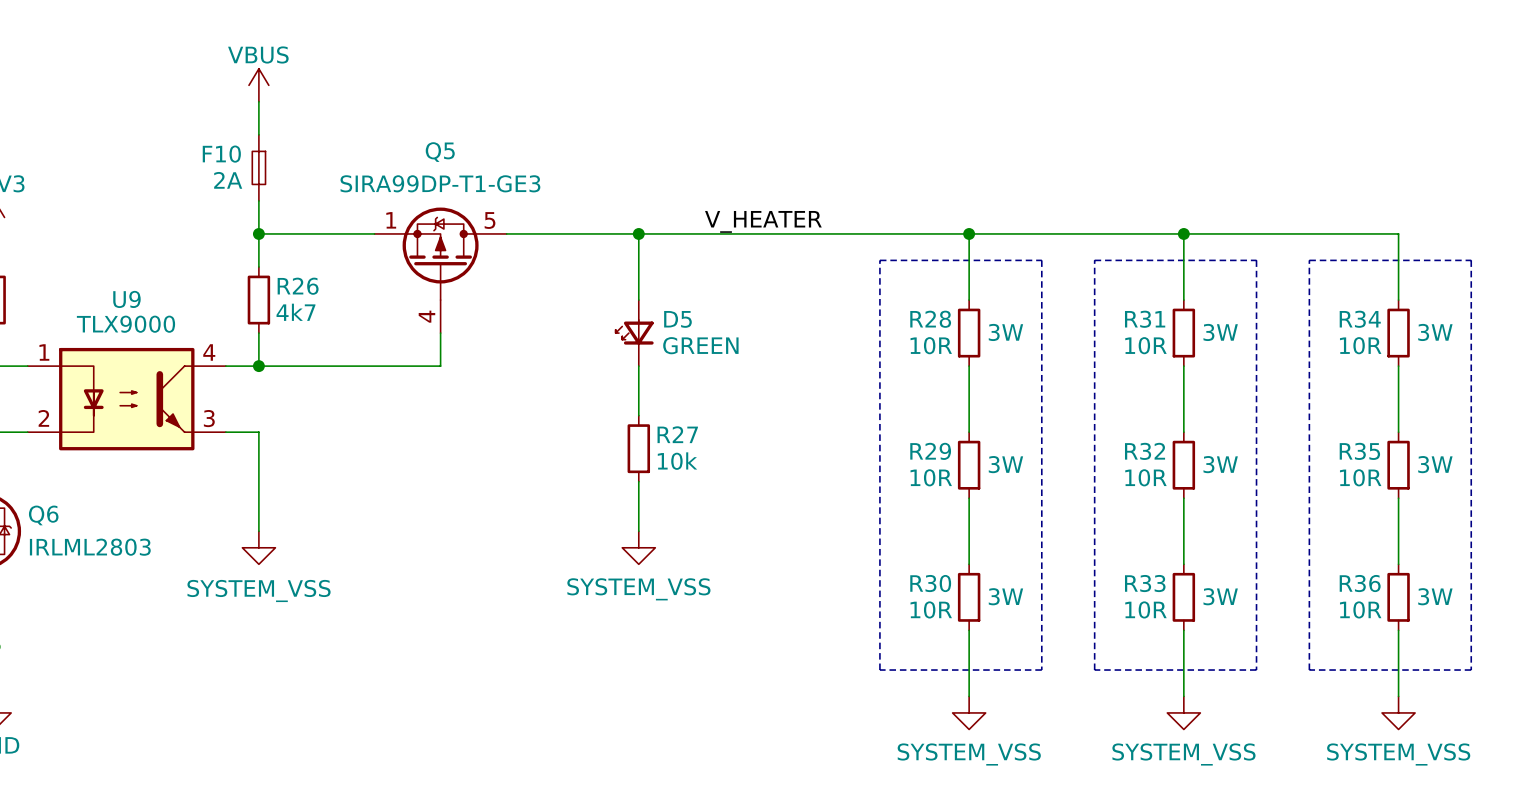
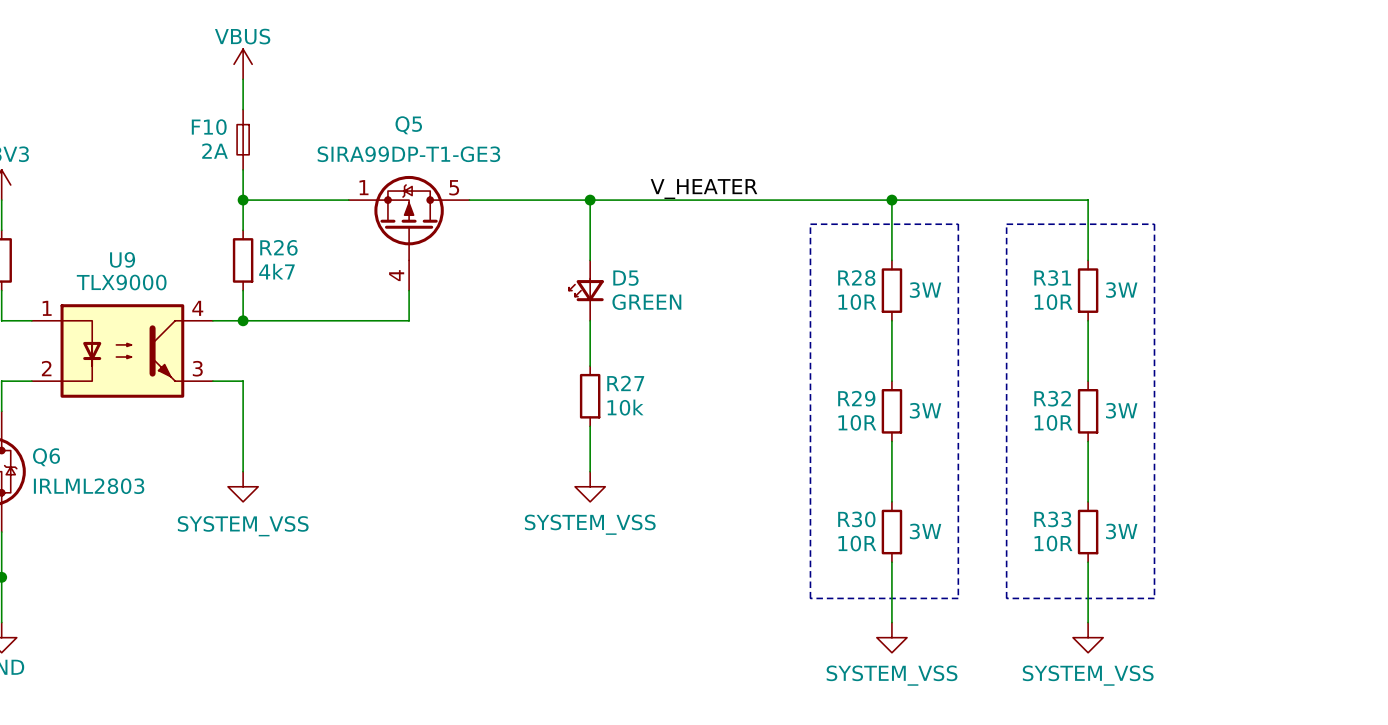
wire: (1183, 233) (1398, 233) (1398, 300) -> none
junction: (1183, 233) -> none
line: (1309, 260) (1471, 260) (1471, 670) (1309, 670) (1309, 260) -> none
R34: 10R (1398, 333) -> none
wire: (1398, 366) (1398, 432) -> none
R35: 10R (1398, 465) -> none
wire: (1398, 498) (1398, 564) -> none
R36: 10R (1398, 597) -> none
wire: (1398, 630) (1398, 696) -> none
power symbol: SYSTEM_VSS (1398, 712) -> none

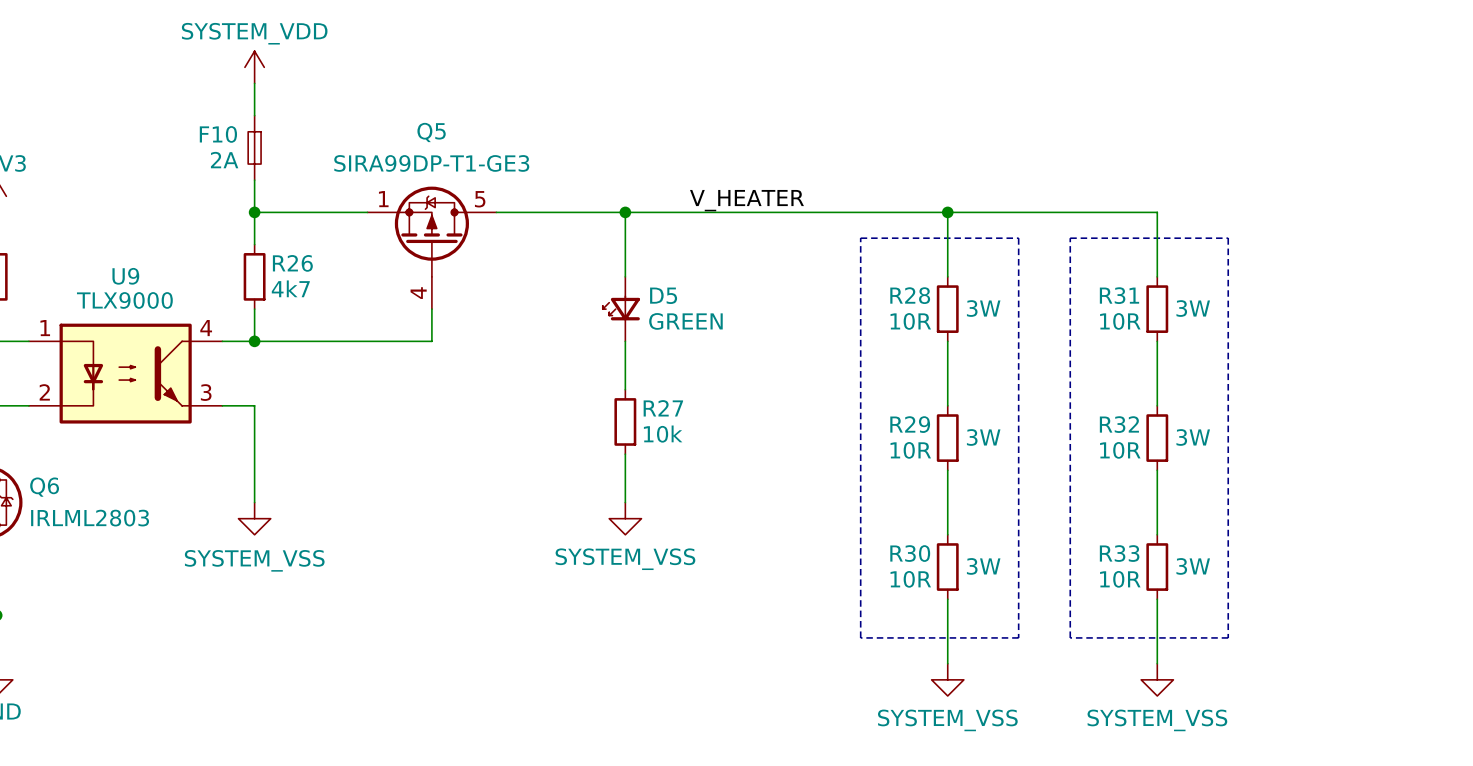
power symbol: VBUS (243, 64) -> SYSTEM_VDD (254, 67)

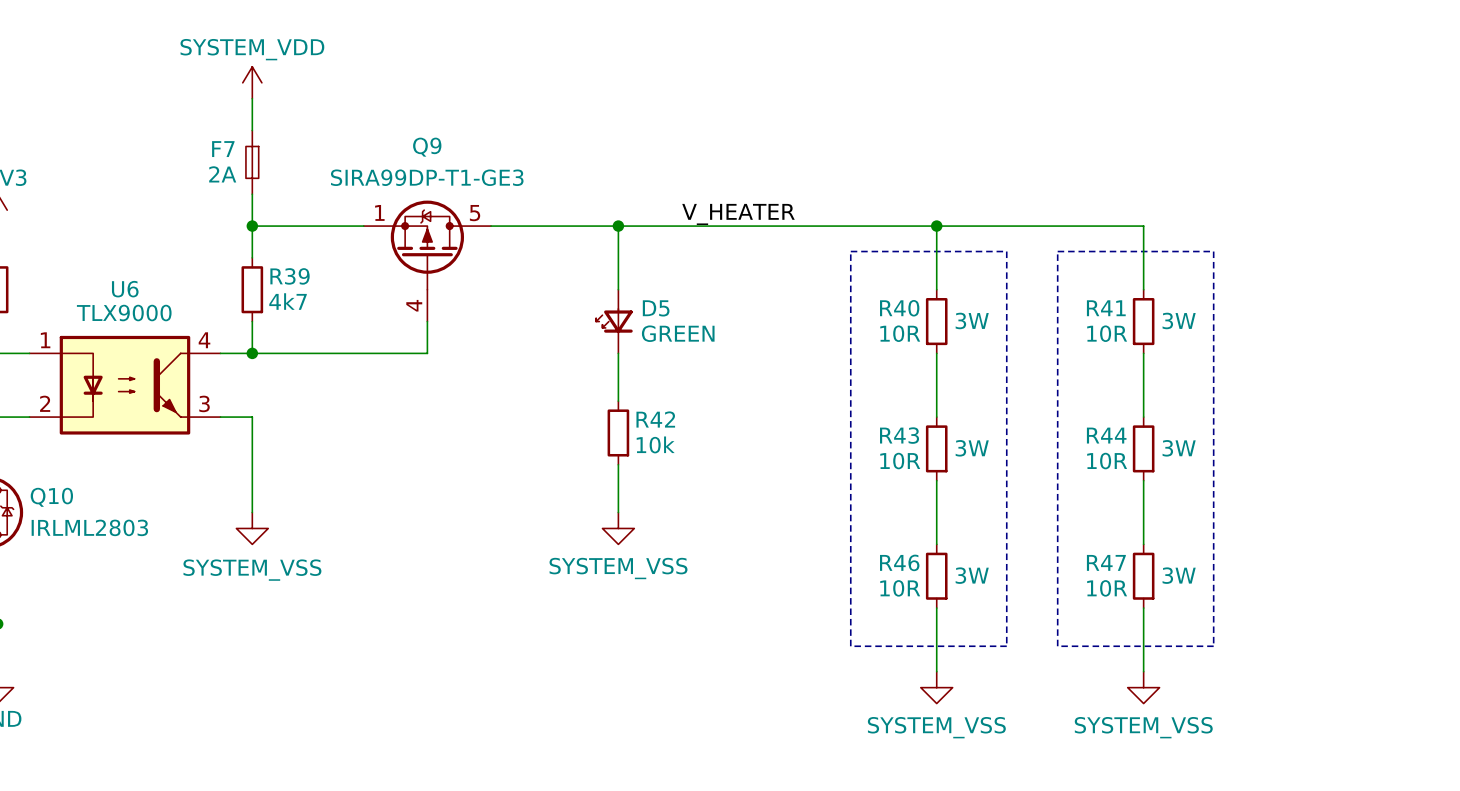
Q5 name: Q5 (431, 132) -> Q9 (427, 147)
F10 name: F10 (218, 134) -> F7 (223, 149)
R26 name: R26 (292, 263) -> R39 (290, 276)
U9 name: U9 (125, 276) -> U6 (125, 289)
R28 name: R28 (910, 295) -> R40 (899, 308)
R31 name: R31 (1119, 295) -> R41 (1106, 308)
R27 name: R27 (663, 408) -> R42 (655, 419)
R29 name: R29 (910, 424) -> R43 (899, 435)
R32 name: R32 (1119, 424) -> R44 (1106, 435)
Q6 name: Q6 (44, 487) -> Q10 (51, 497)
R30 name: R30 (910, 553) -> R46 (899, 562)
R33 name: R33 (1119, 553) -> R47 (1106, 562)

